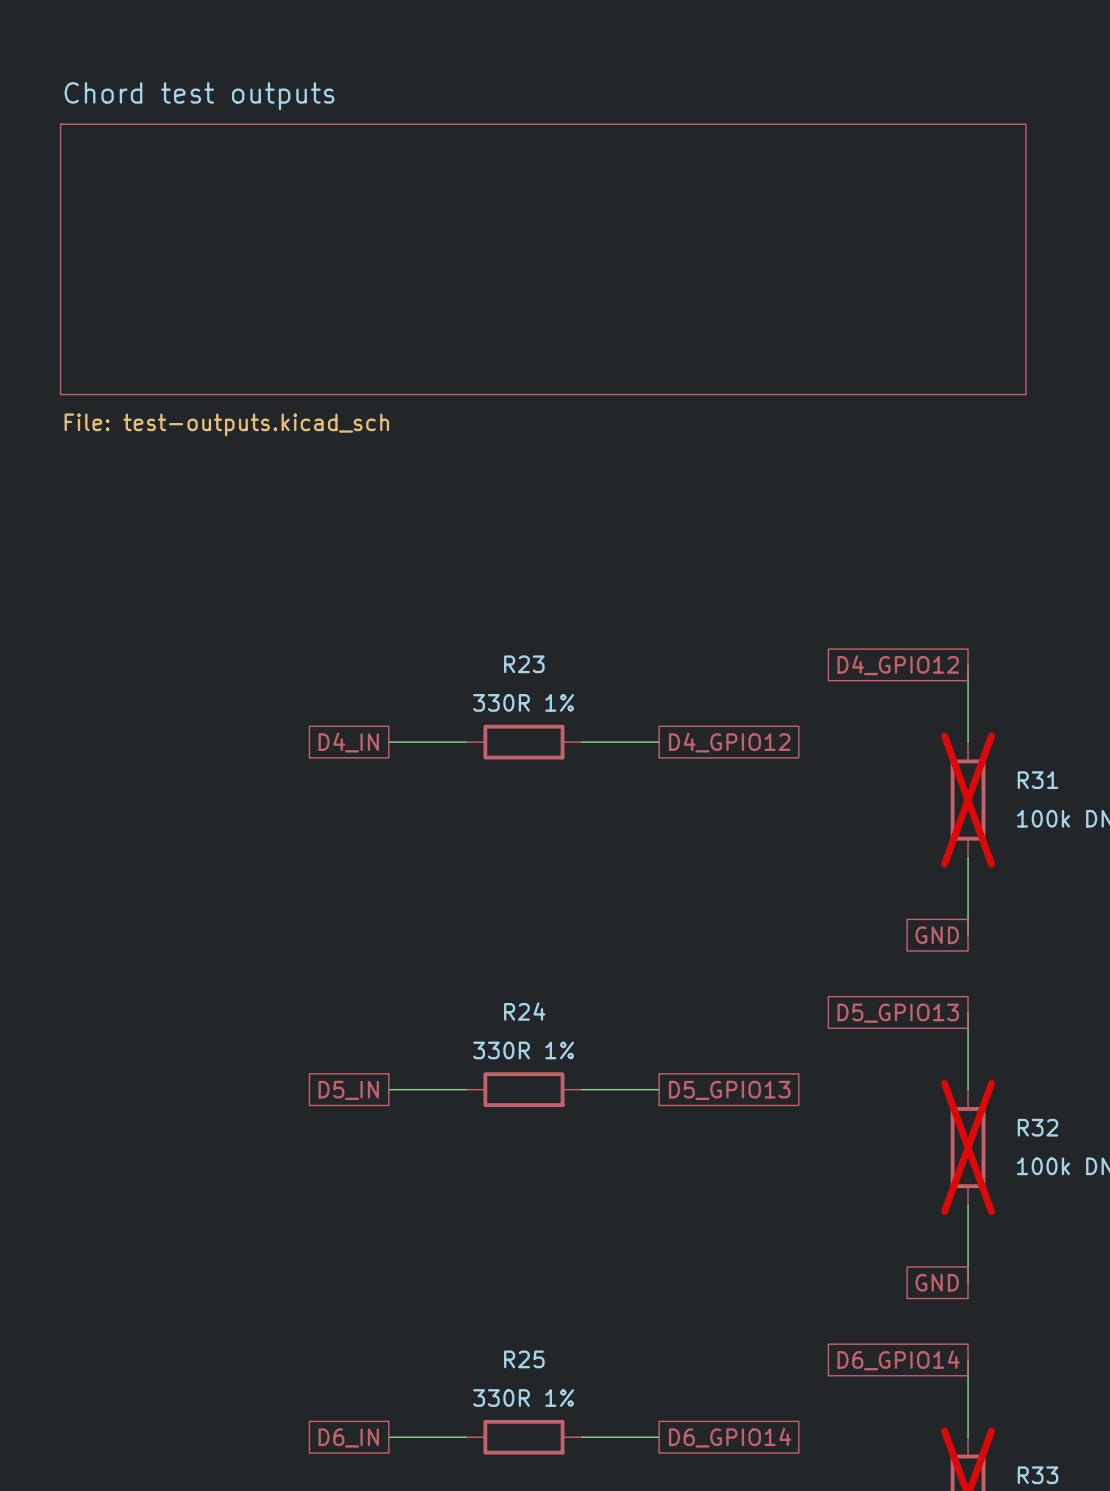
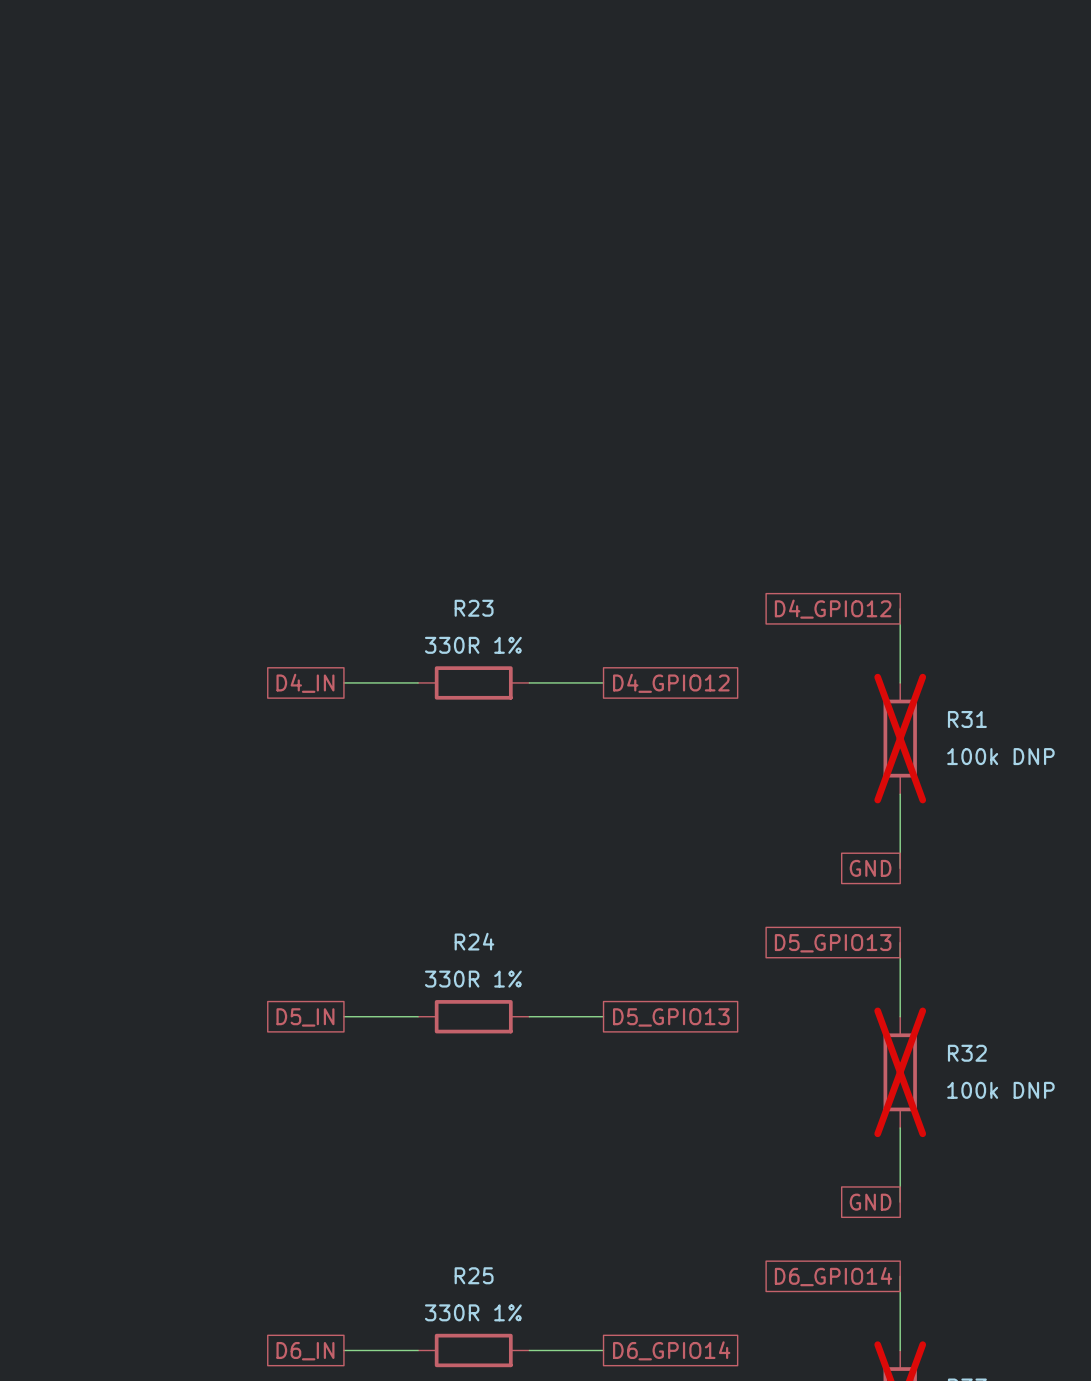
sheet Chord test outputs: File: test-outputs.kicad_sch (543, 259) -> none

